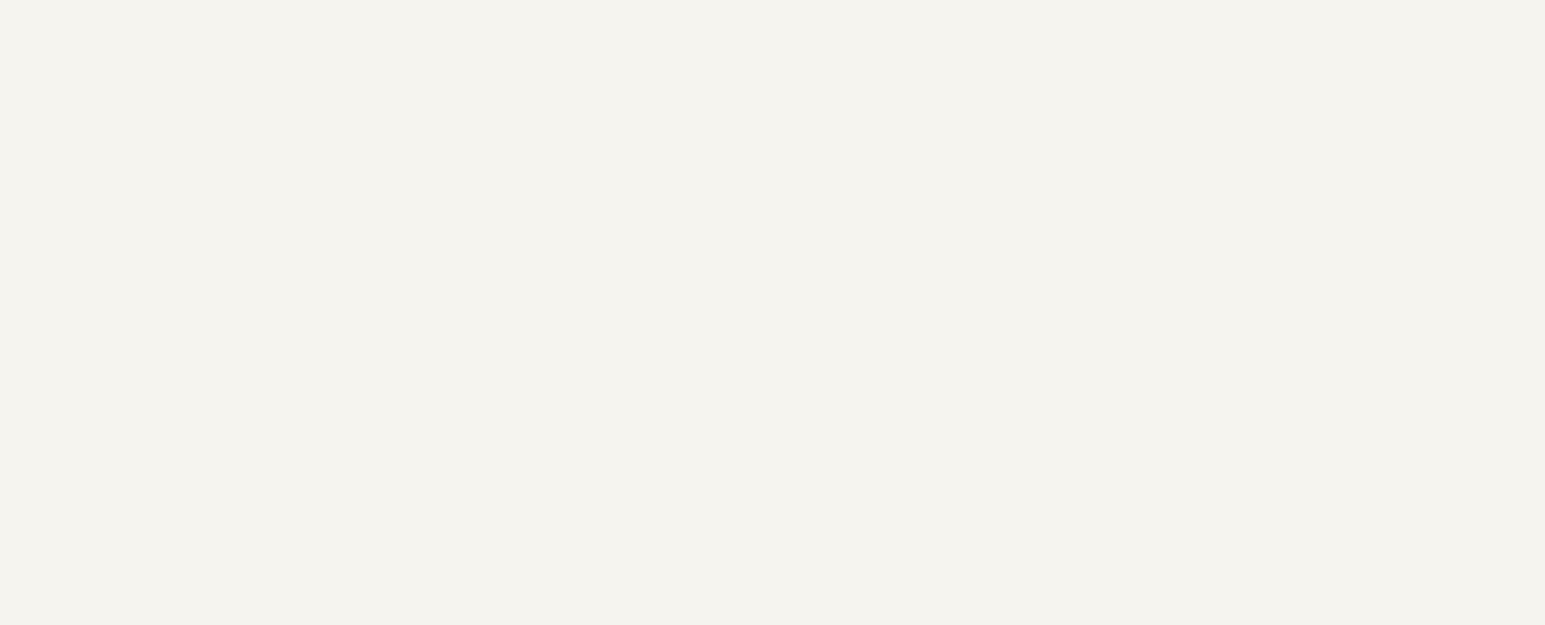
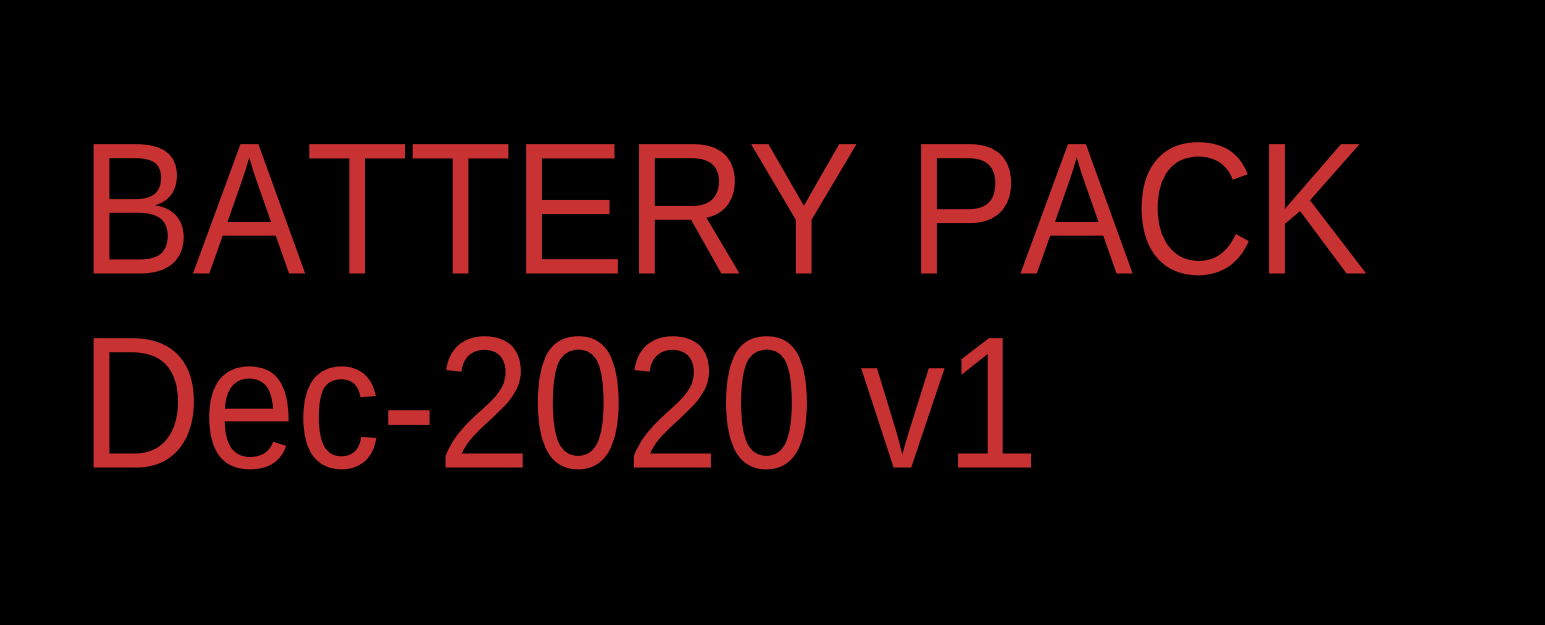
text: none -> BATTERY PACK (729, 208)
text: none -> Dec-2020 v1 (562, 402)

